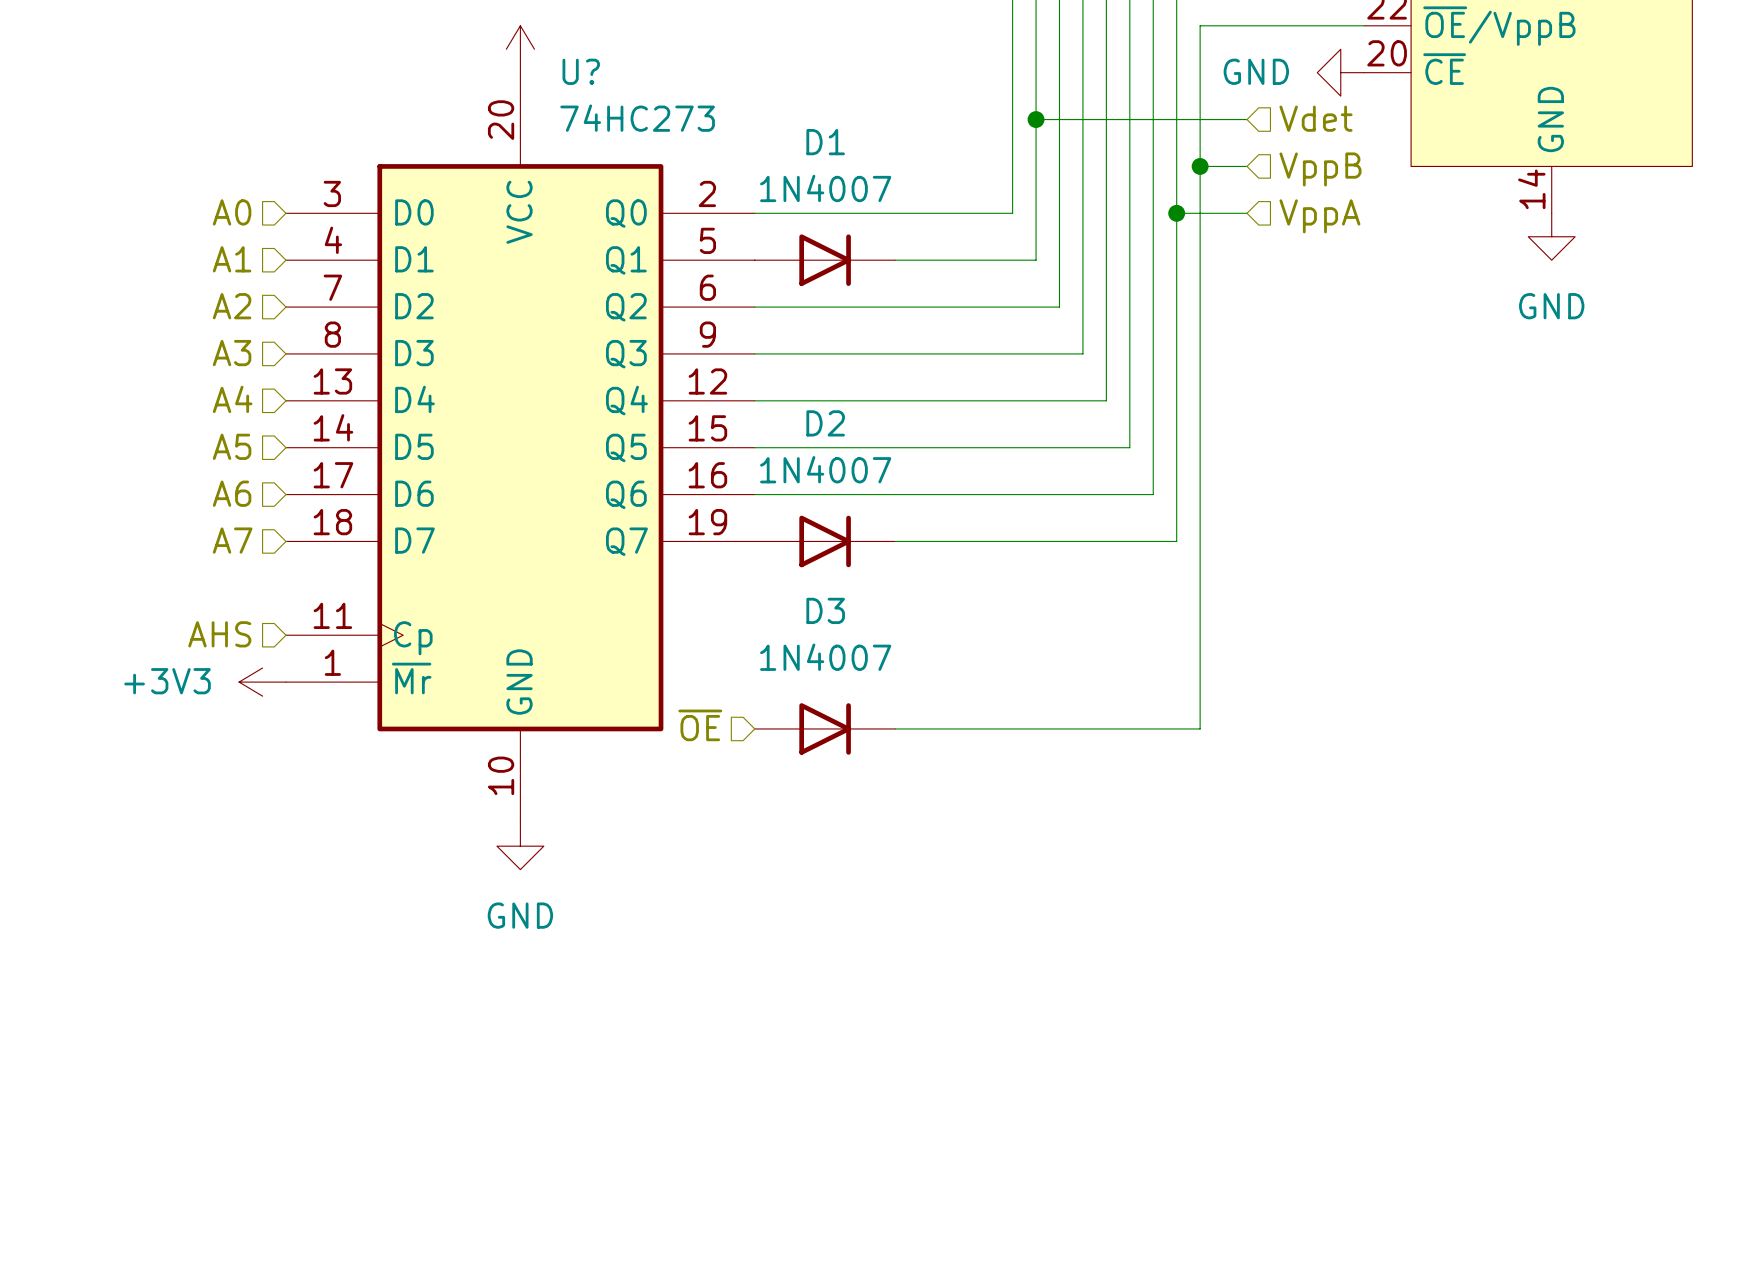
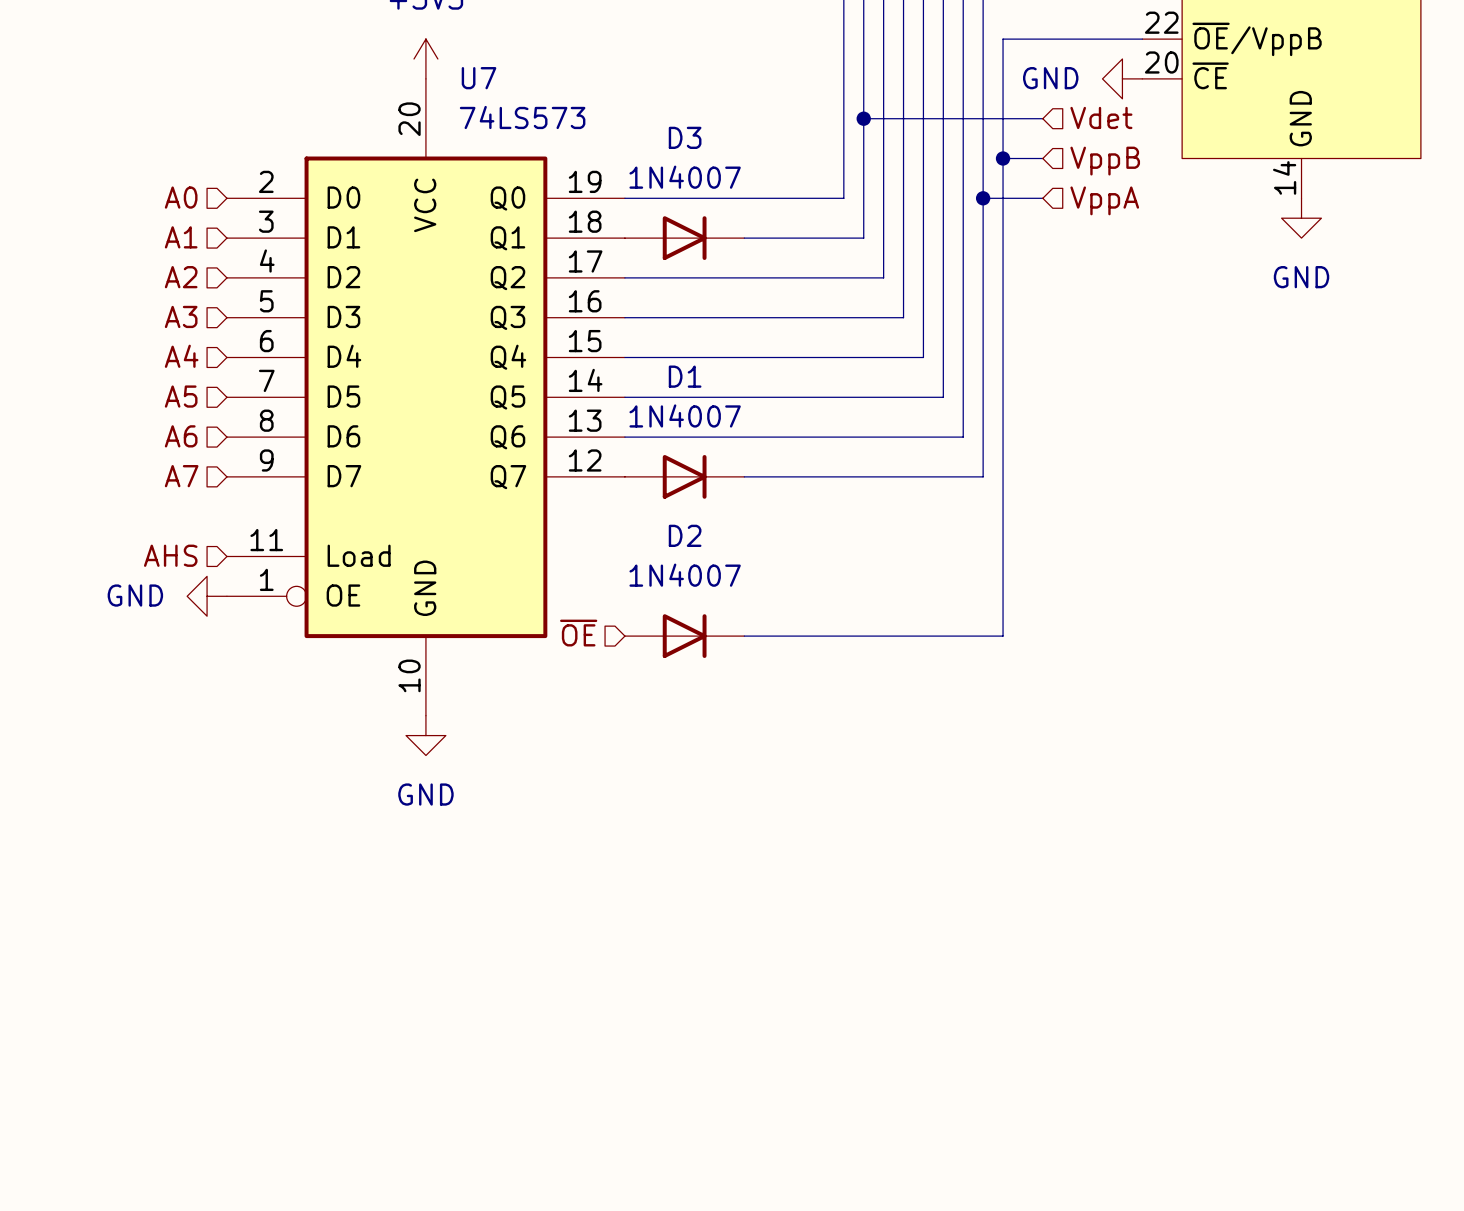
D1 name: D1 (825, 142) -> D3 (685, 137)
D2 name: D2 (825, 423) -> D1 (685, 376)
U?: 74HC273 (520, 447) -> none
U7: none -> 74LS573 (425, 397)
D3 name: D3 (825, 610) -> D2 (685, 535)
power symbol: +3V3 (262, 682) -> GND (207, 596)

